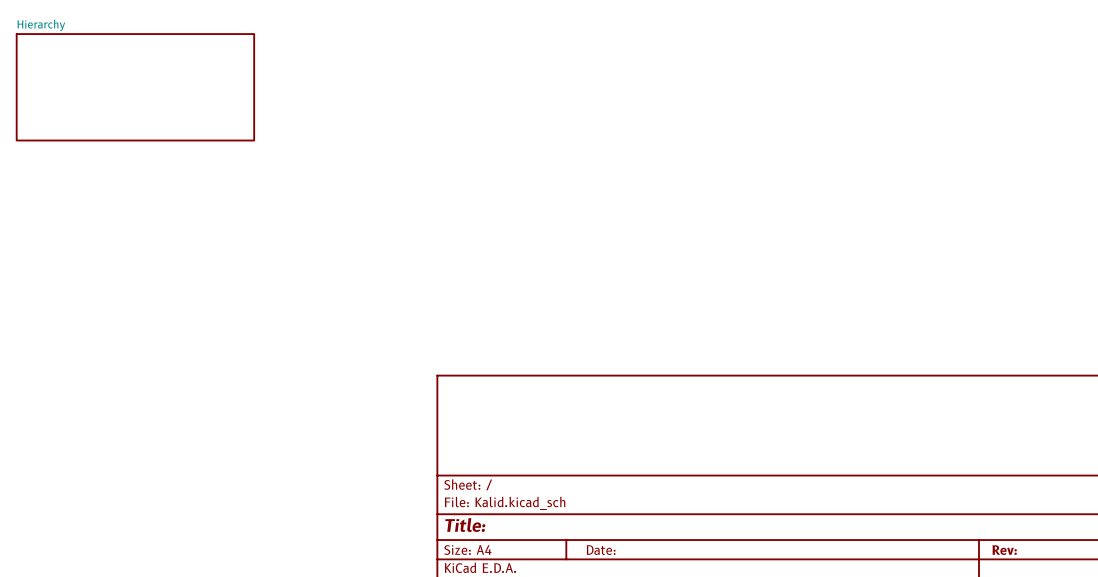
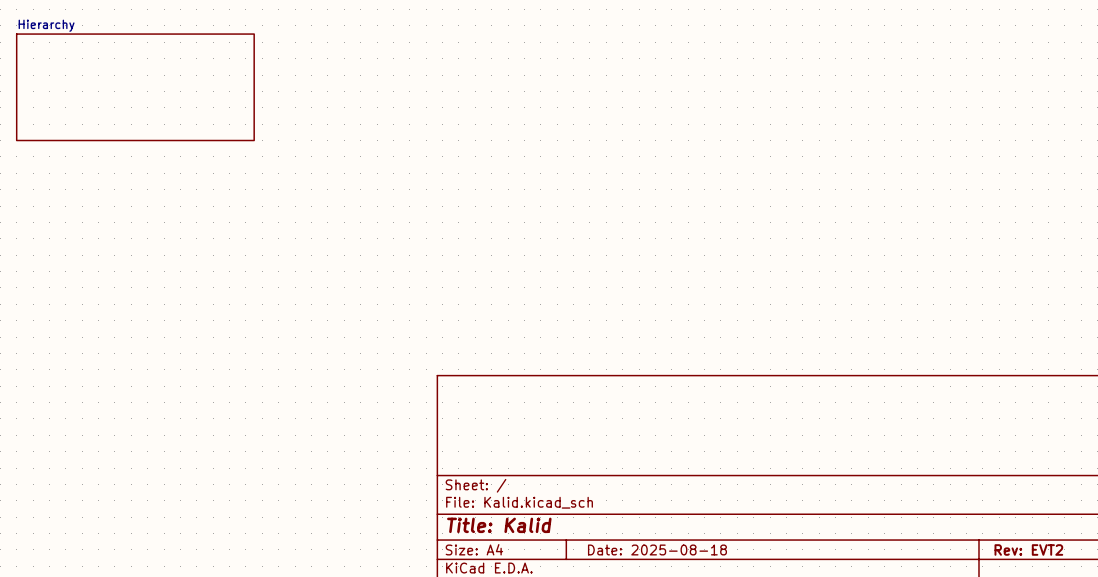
title block: Title: (465, 524) -> Title: Kalid (499, 525)
title block: Date: (601, 550) -> Date: 2025-08-18 (657, 549)
title block: Rev: (1004, 550) -> Rev: EVT2 (1028, 549)

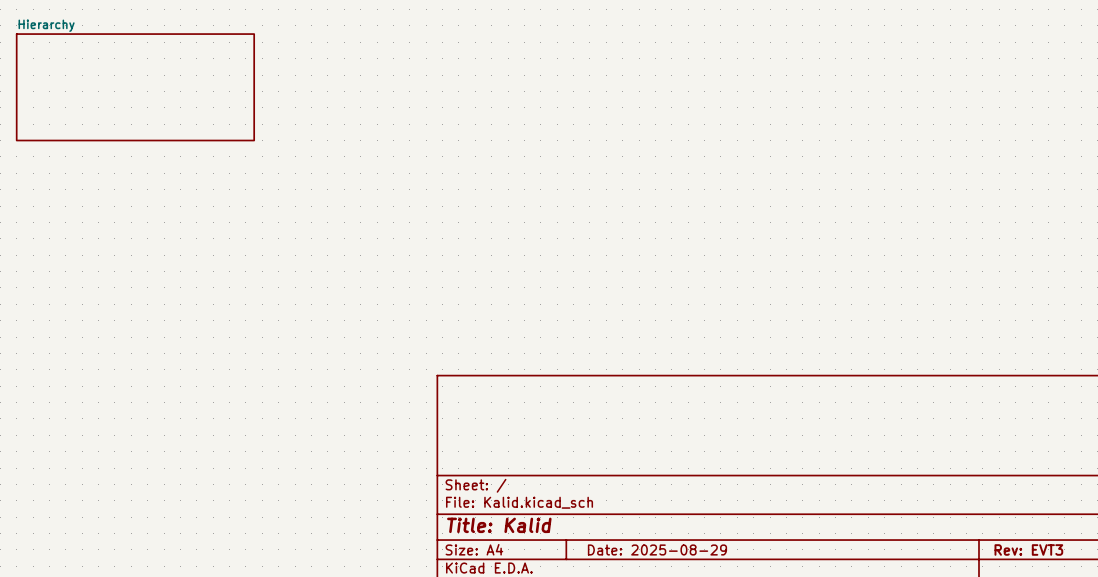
title block: Date: 2025-08-18 (657, 549) -> Date: 2025-08-29 (657, 549)
title block: Rev: EVT2 (1028, 549) -> Rev: EVT3 (1028, 549)

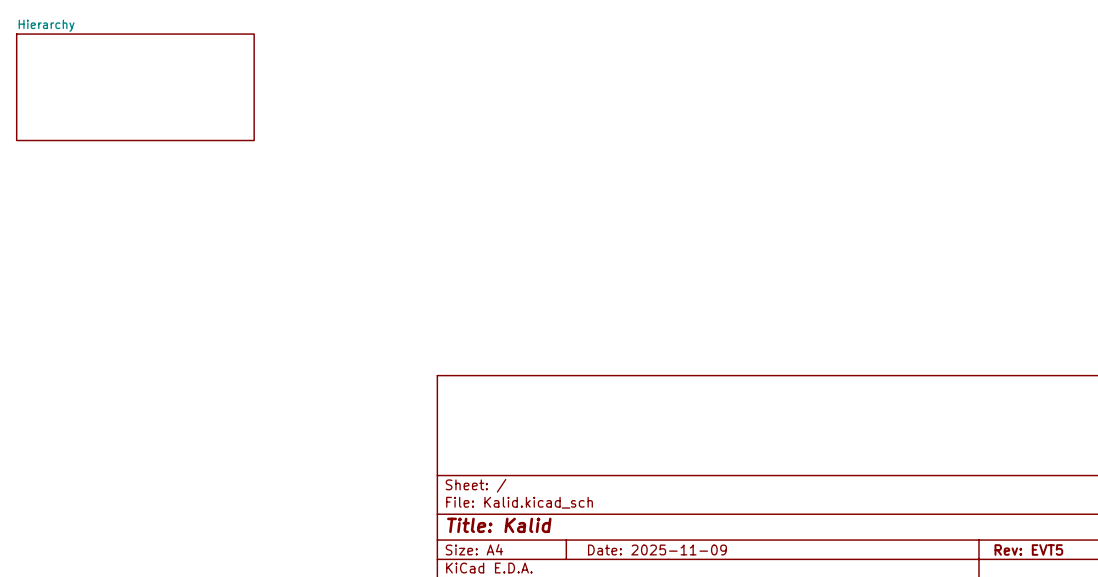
title block: Date: 2025-08-29 (657, 549) -> Date: 2025-11-09 (657, 549)
title block: Rev: EVT3 (1028, 549) -> Rev: EVT5 (1028, 549)

